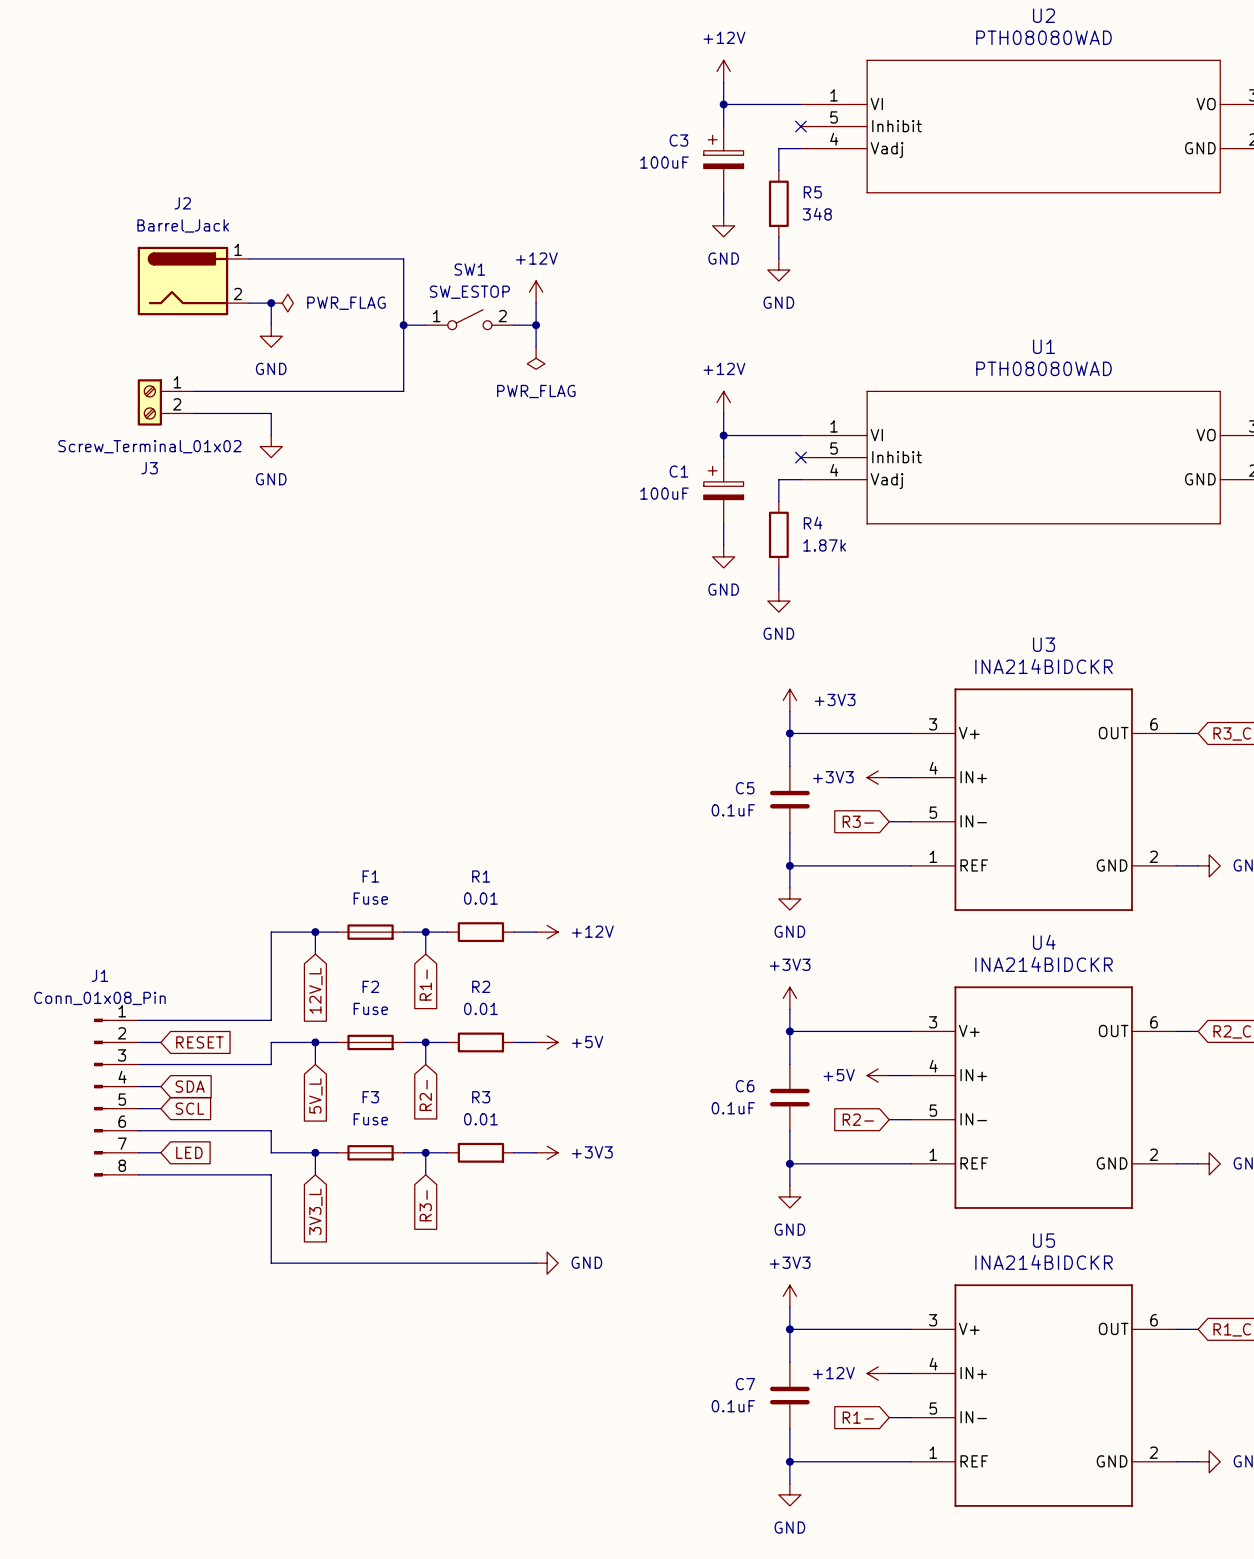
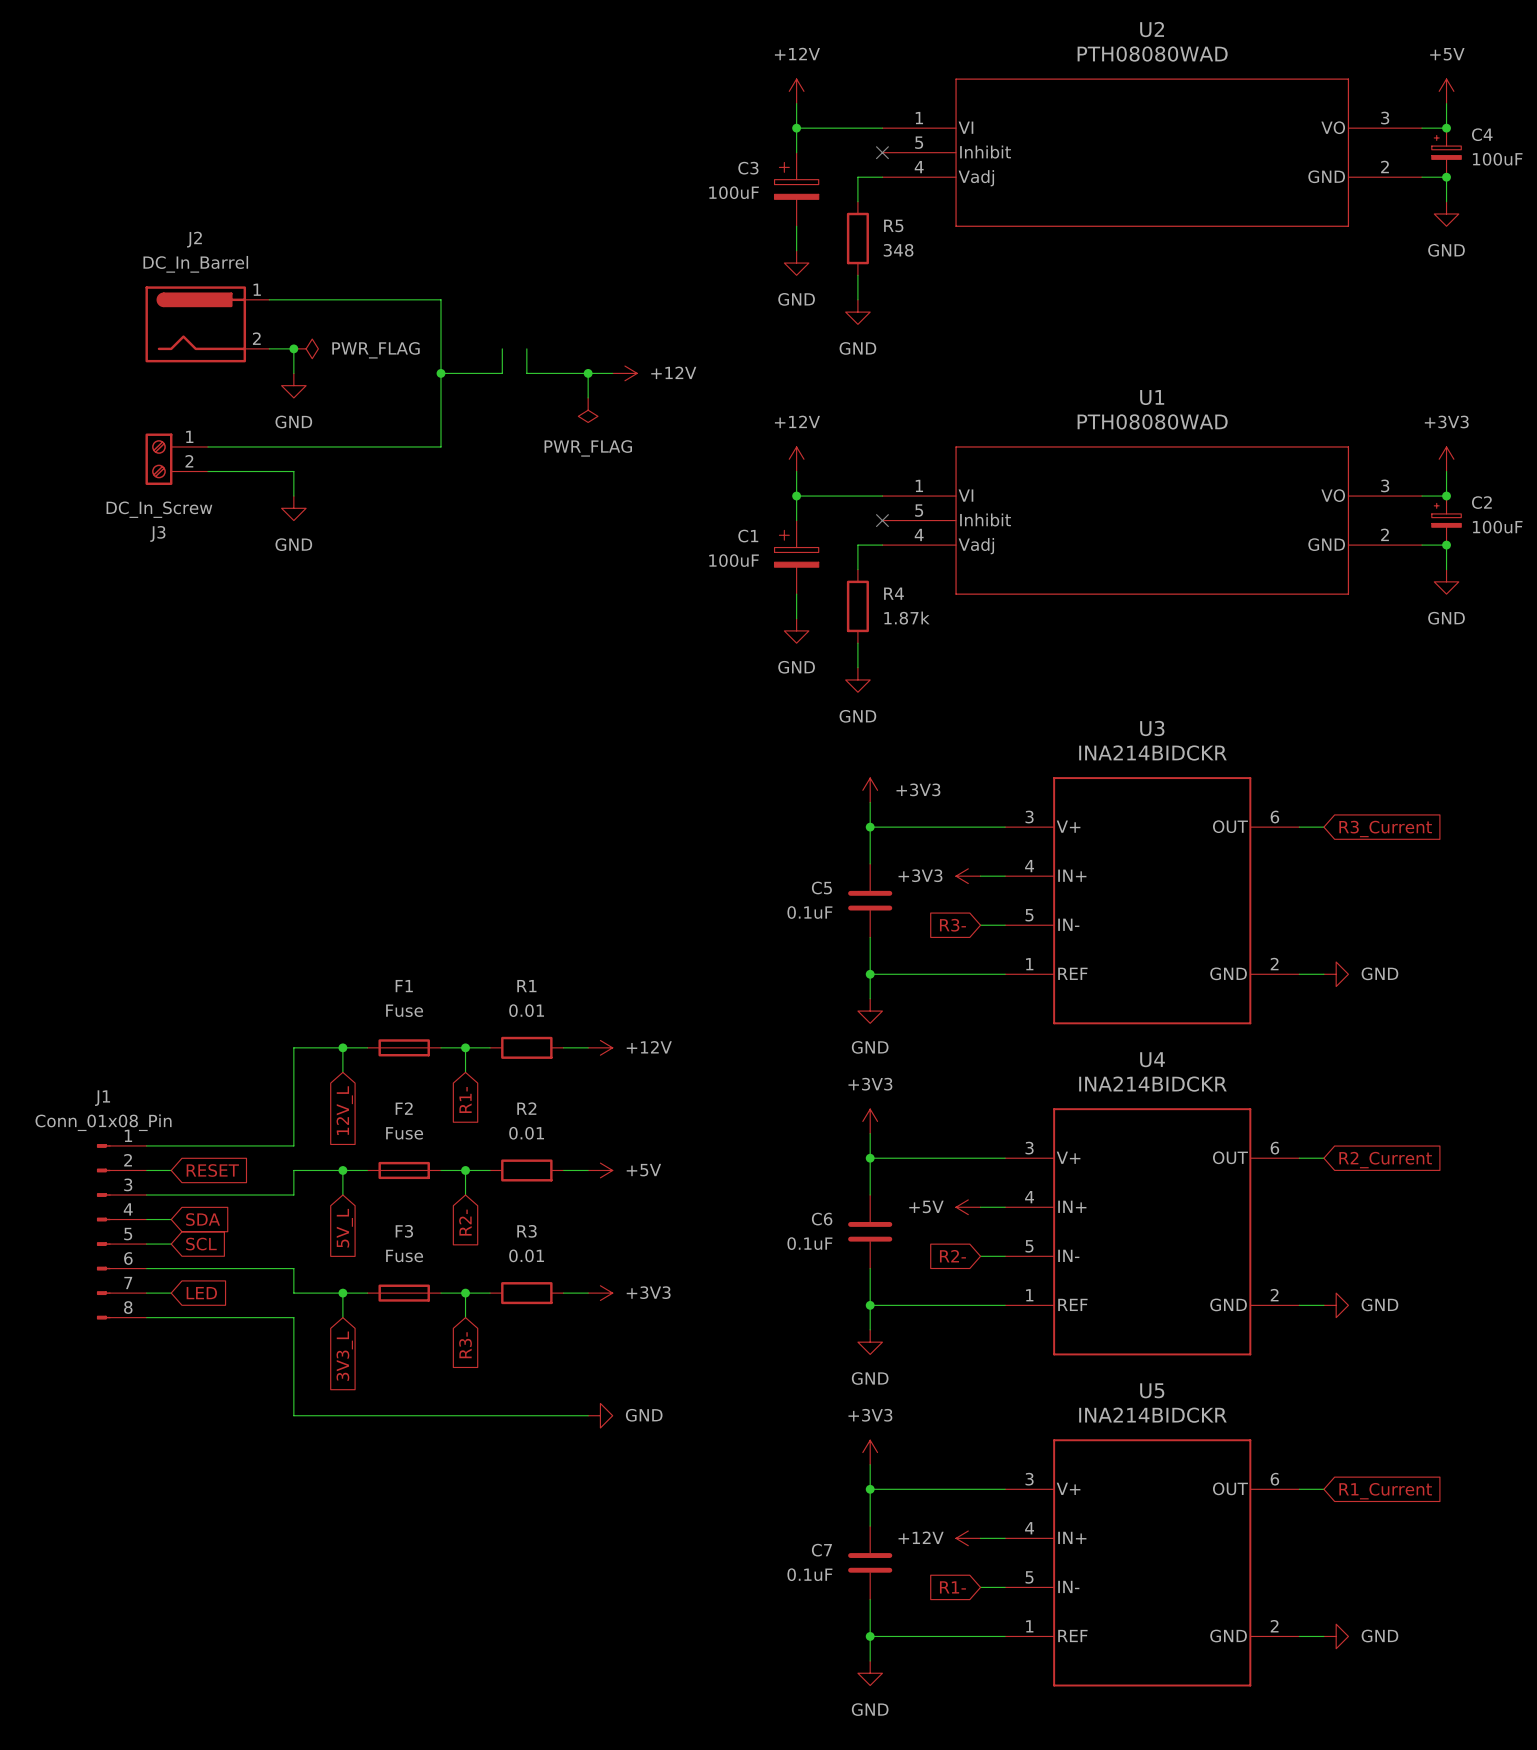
J2 value: Barrel_Jack (183, 225) -> DC_In_Barrel (195, 264)
power symbol rotation: 0° (536, 292) -> 90° clockwise (624, 373)
power symbol position: +12V (536, 292) -> +12V (624, 373)
wire: none -> (502, 348) (502, 373) (465, 373)
wire: none -> (526, 348) (526, 373) (563, 373)
wire: (536, 303) (536, 325) -> (612, 373) (588, 373)
SW1: SW_ESTOP (469, 319) -> none
J3 value: Screw_Terminal_01x02 (149, 446) -> DC_In_Screw (159, 509)

